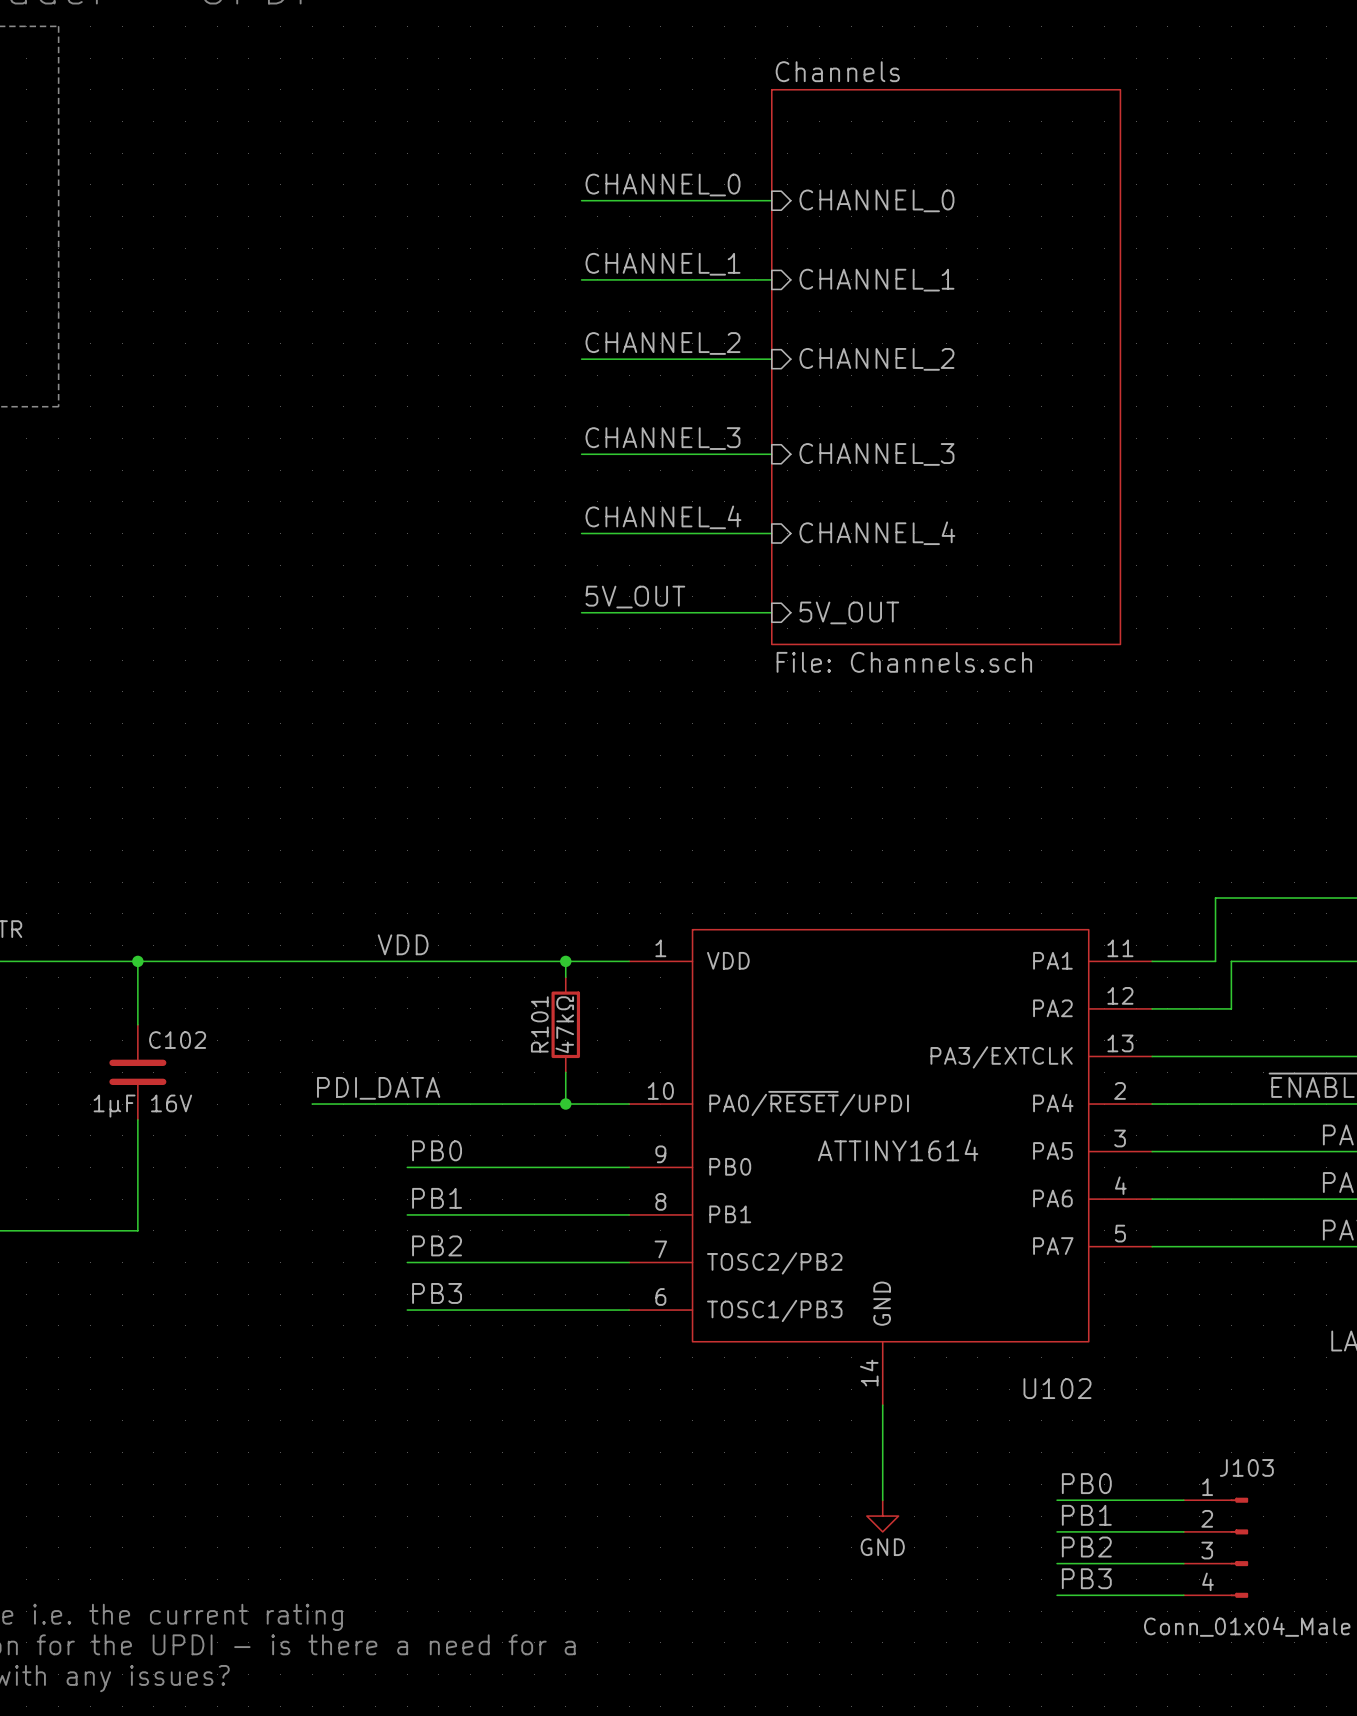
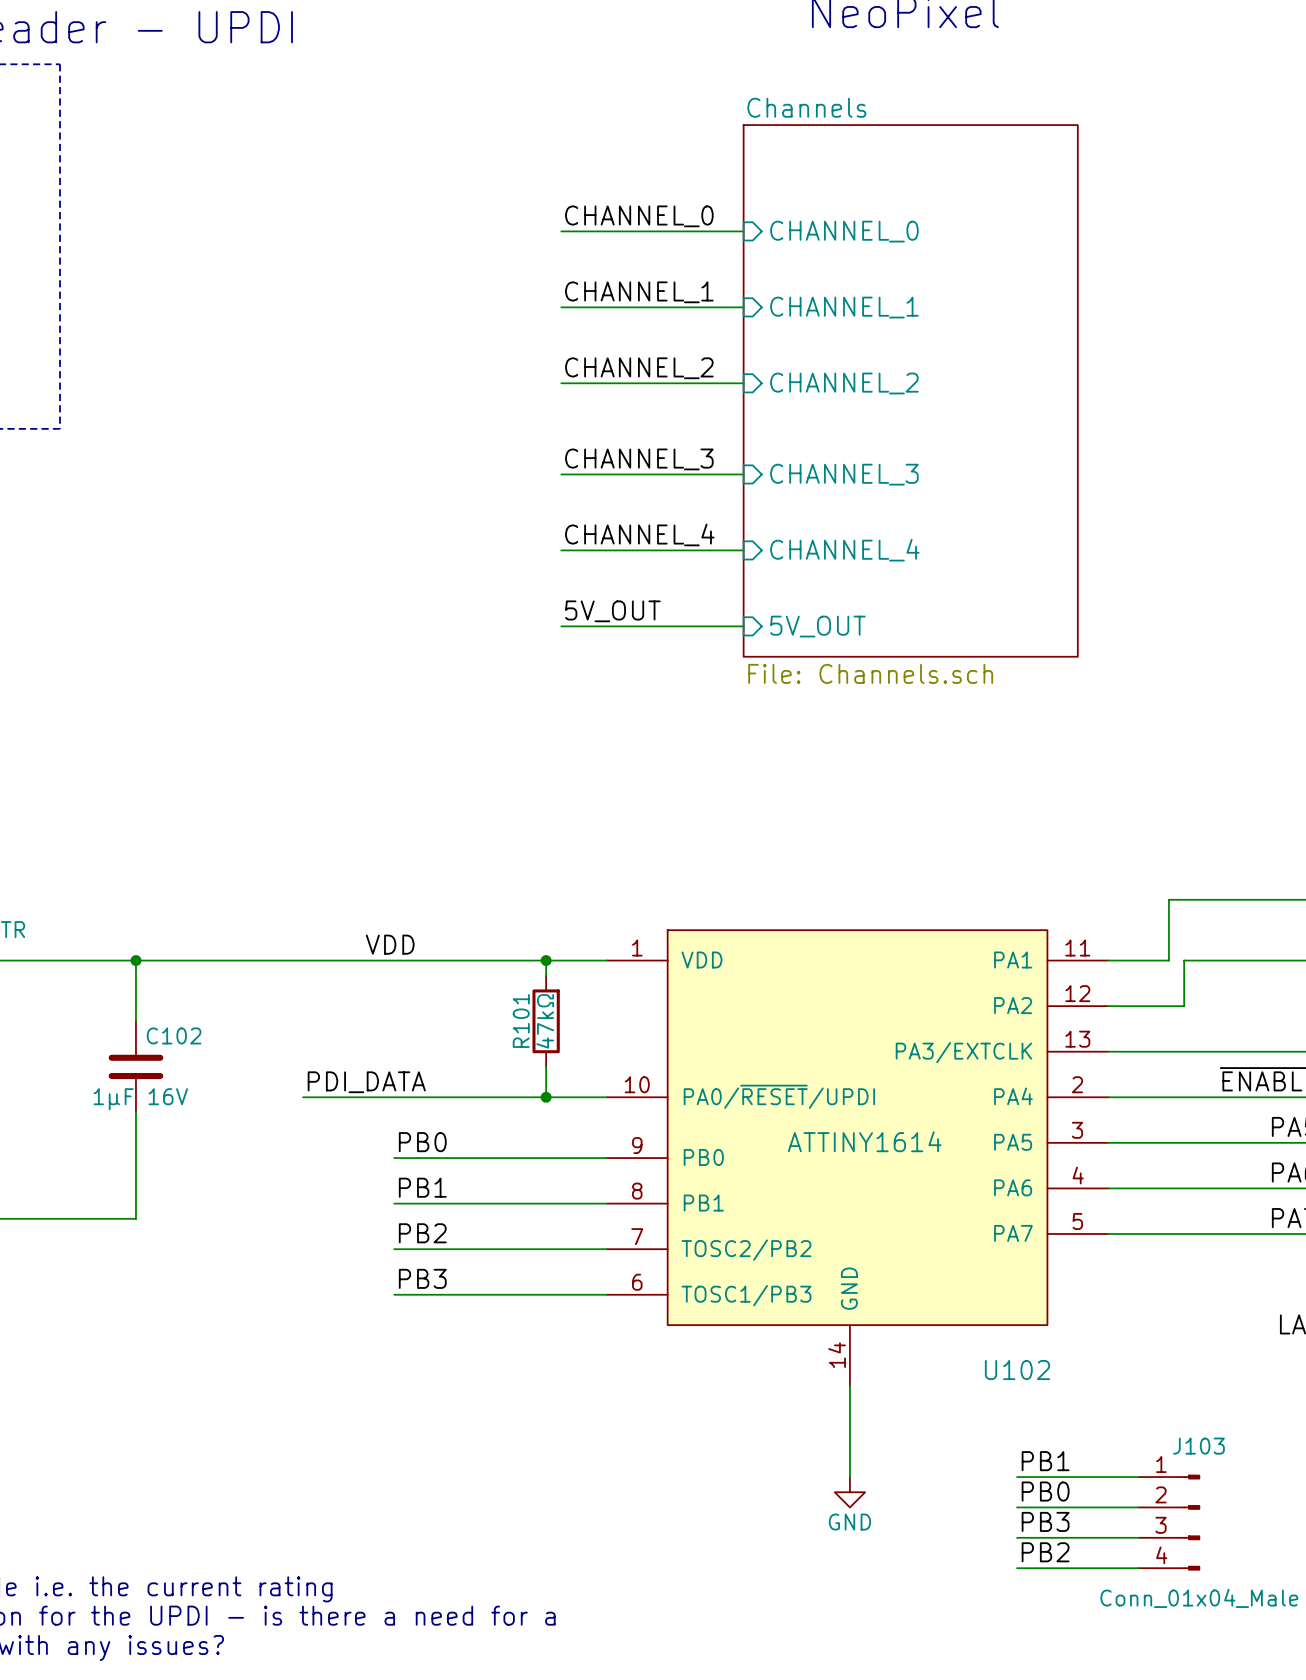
label: PB0 (1086, 1483) -> PB1 (1045, 1461)
label: PB1 (1086, 1515) -> PB0 (1045, 1491)
label: PB2 (1086, 1547) -> PB3 (1045, 1521)
label: PB3 (1086, 1578) -> PB2 (1045, 1552)

